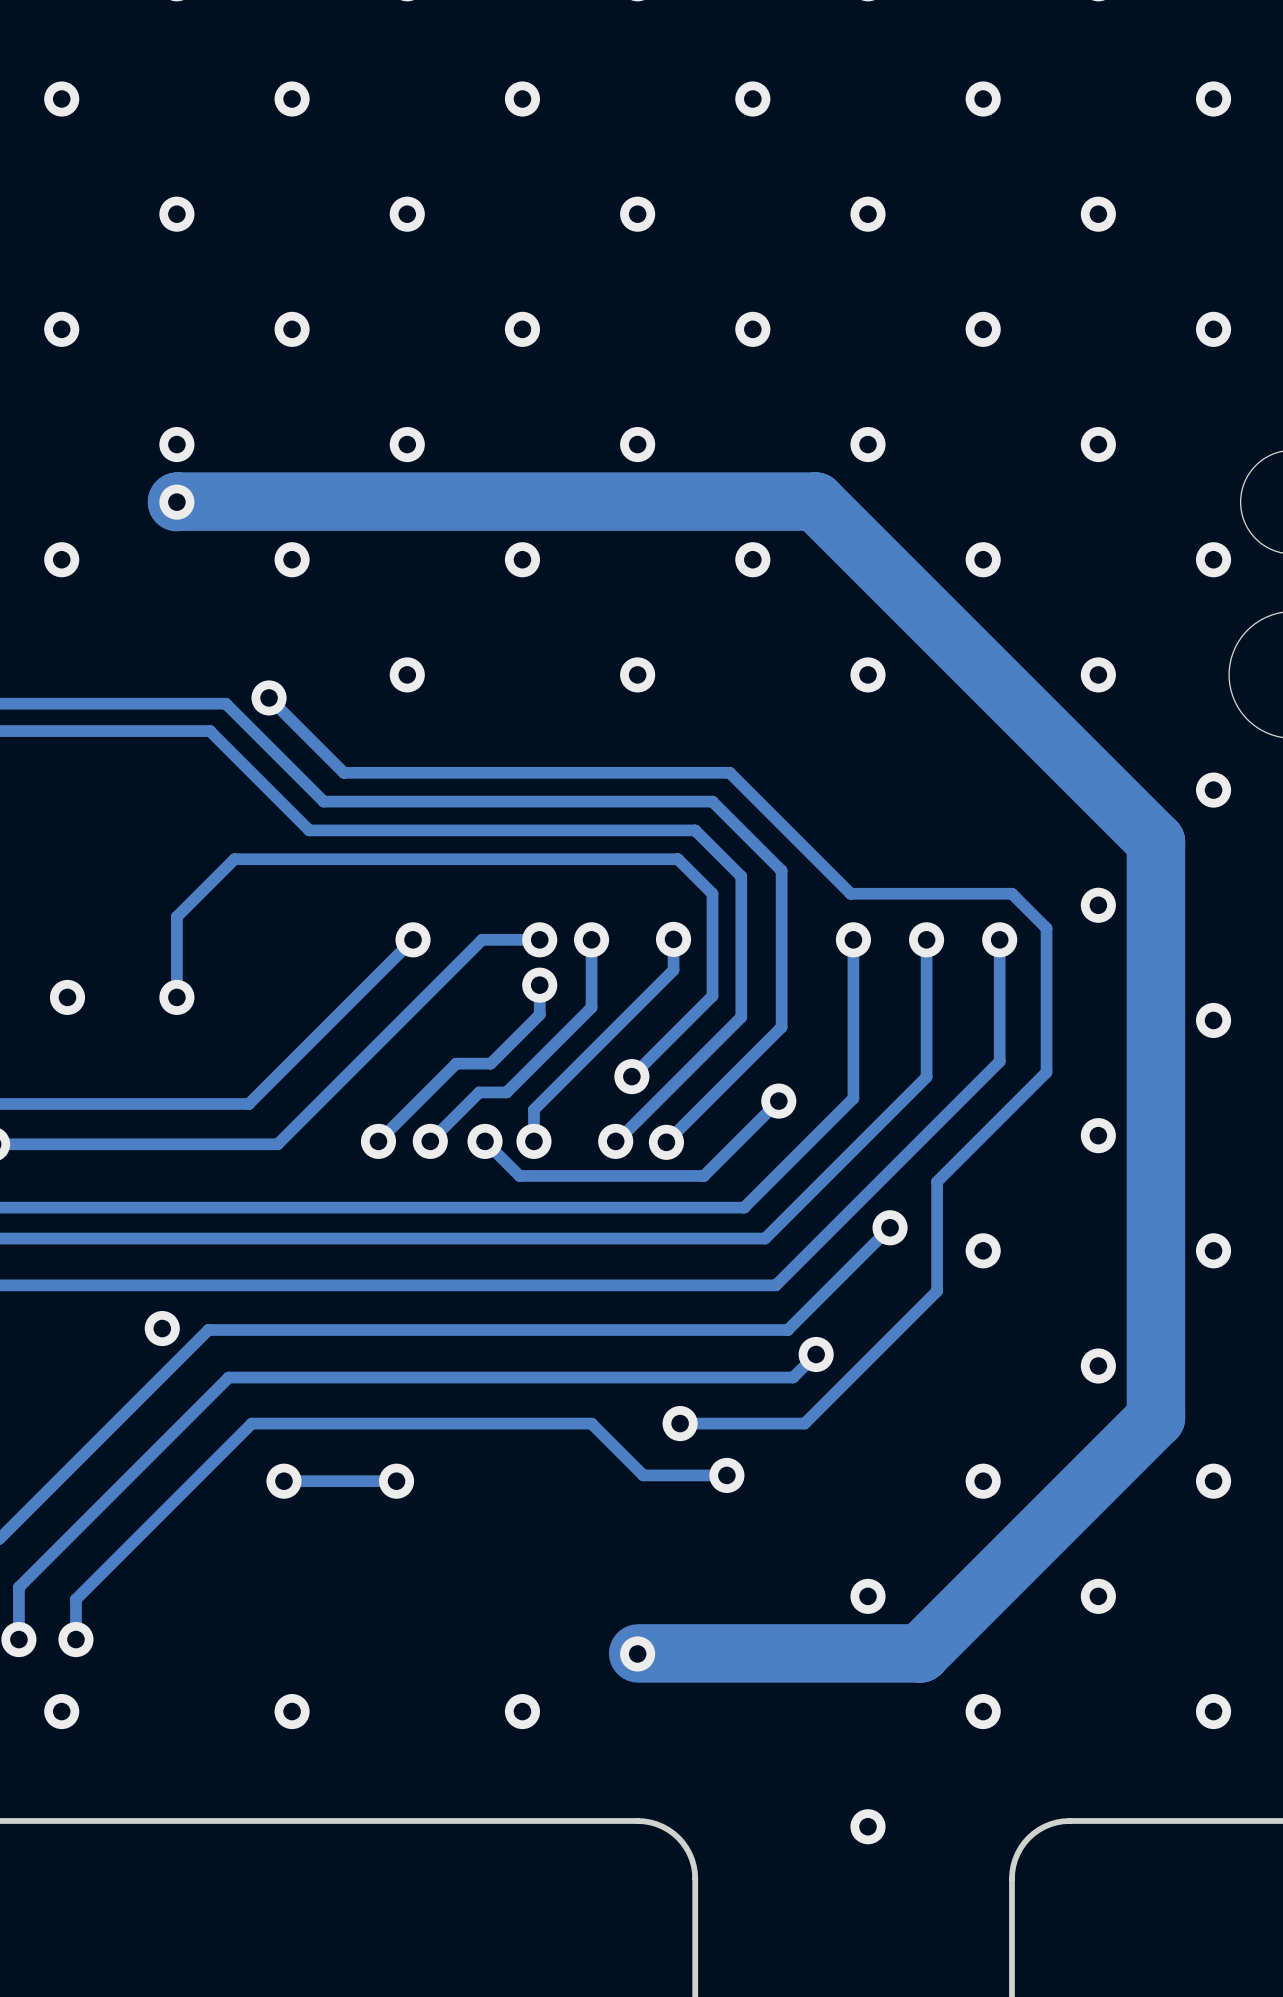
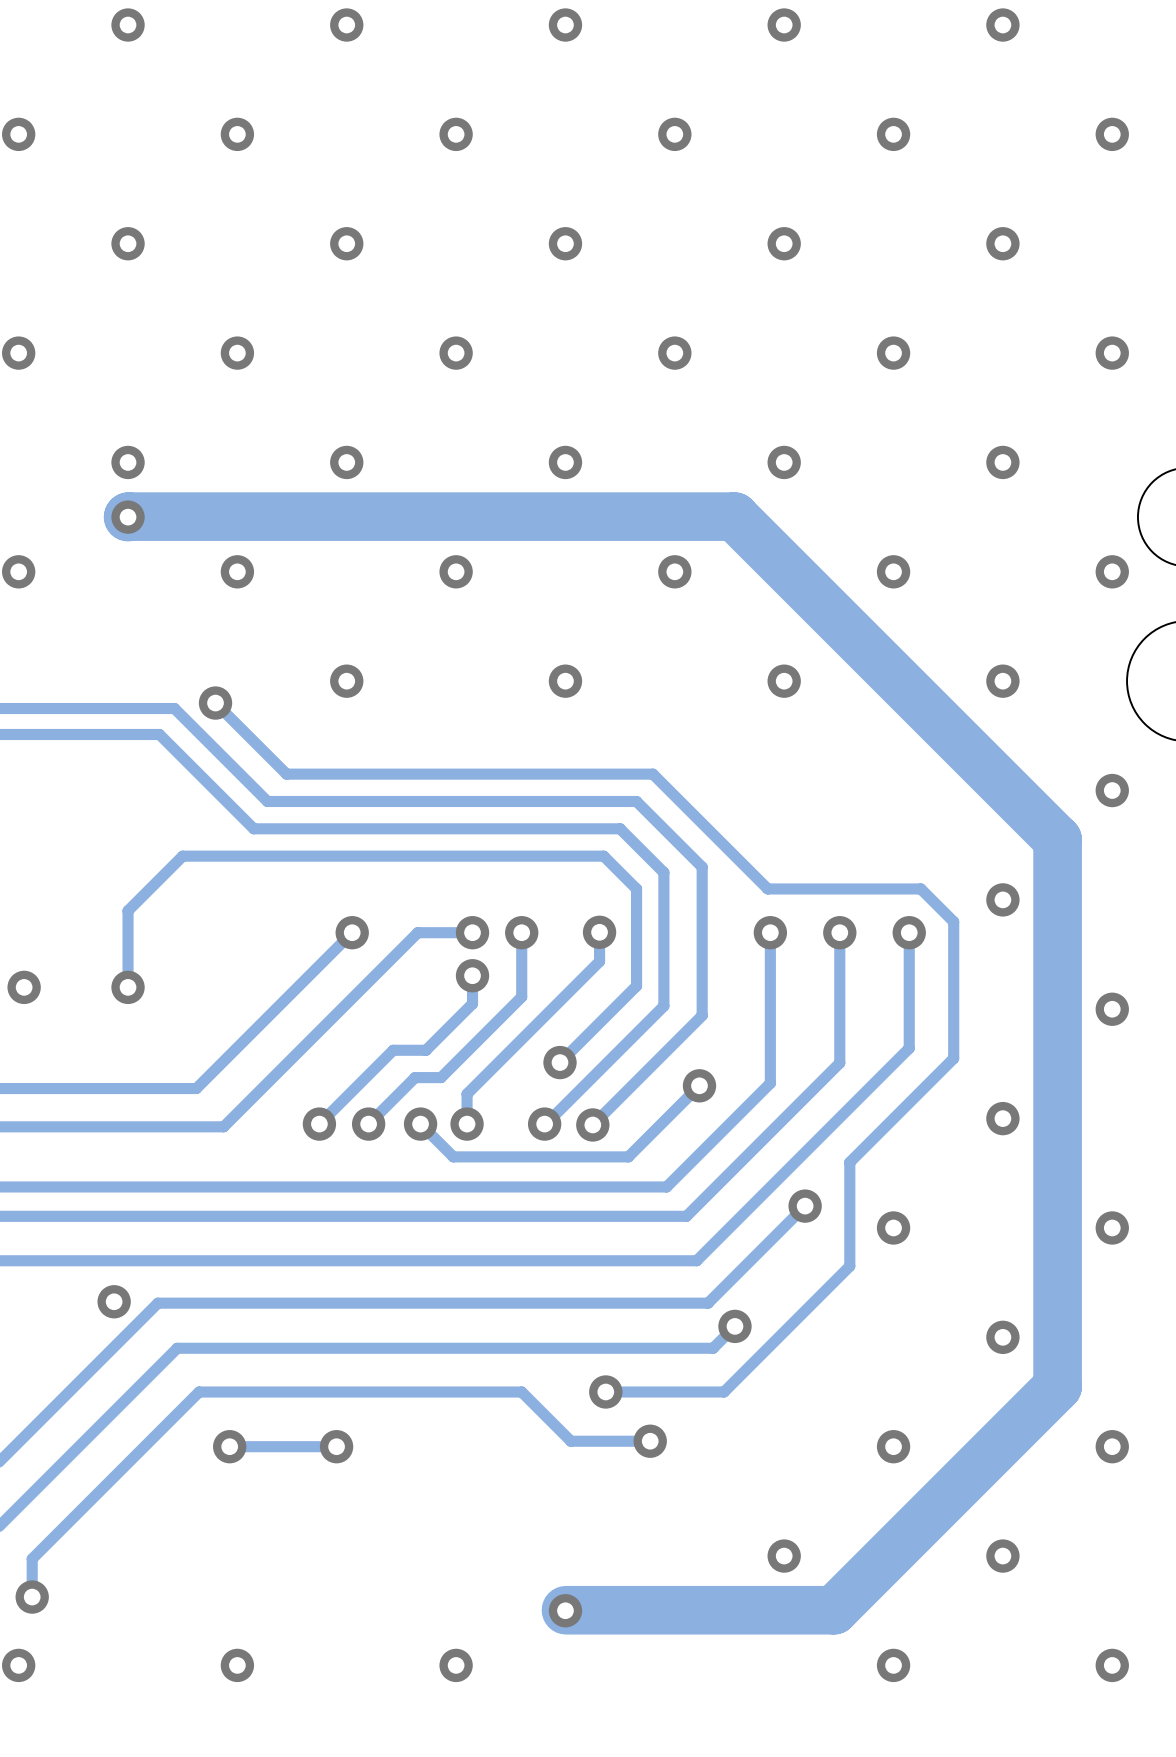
track width: thick (177, 501) (815, 501) (1155, 841) (1155, 1417) (920, 1653) (638, 1653) -> thin (128, 516) (734, 516) (1057, 839) (1057, 1386) (833, 1610) (565, 1610)

